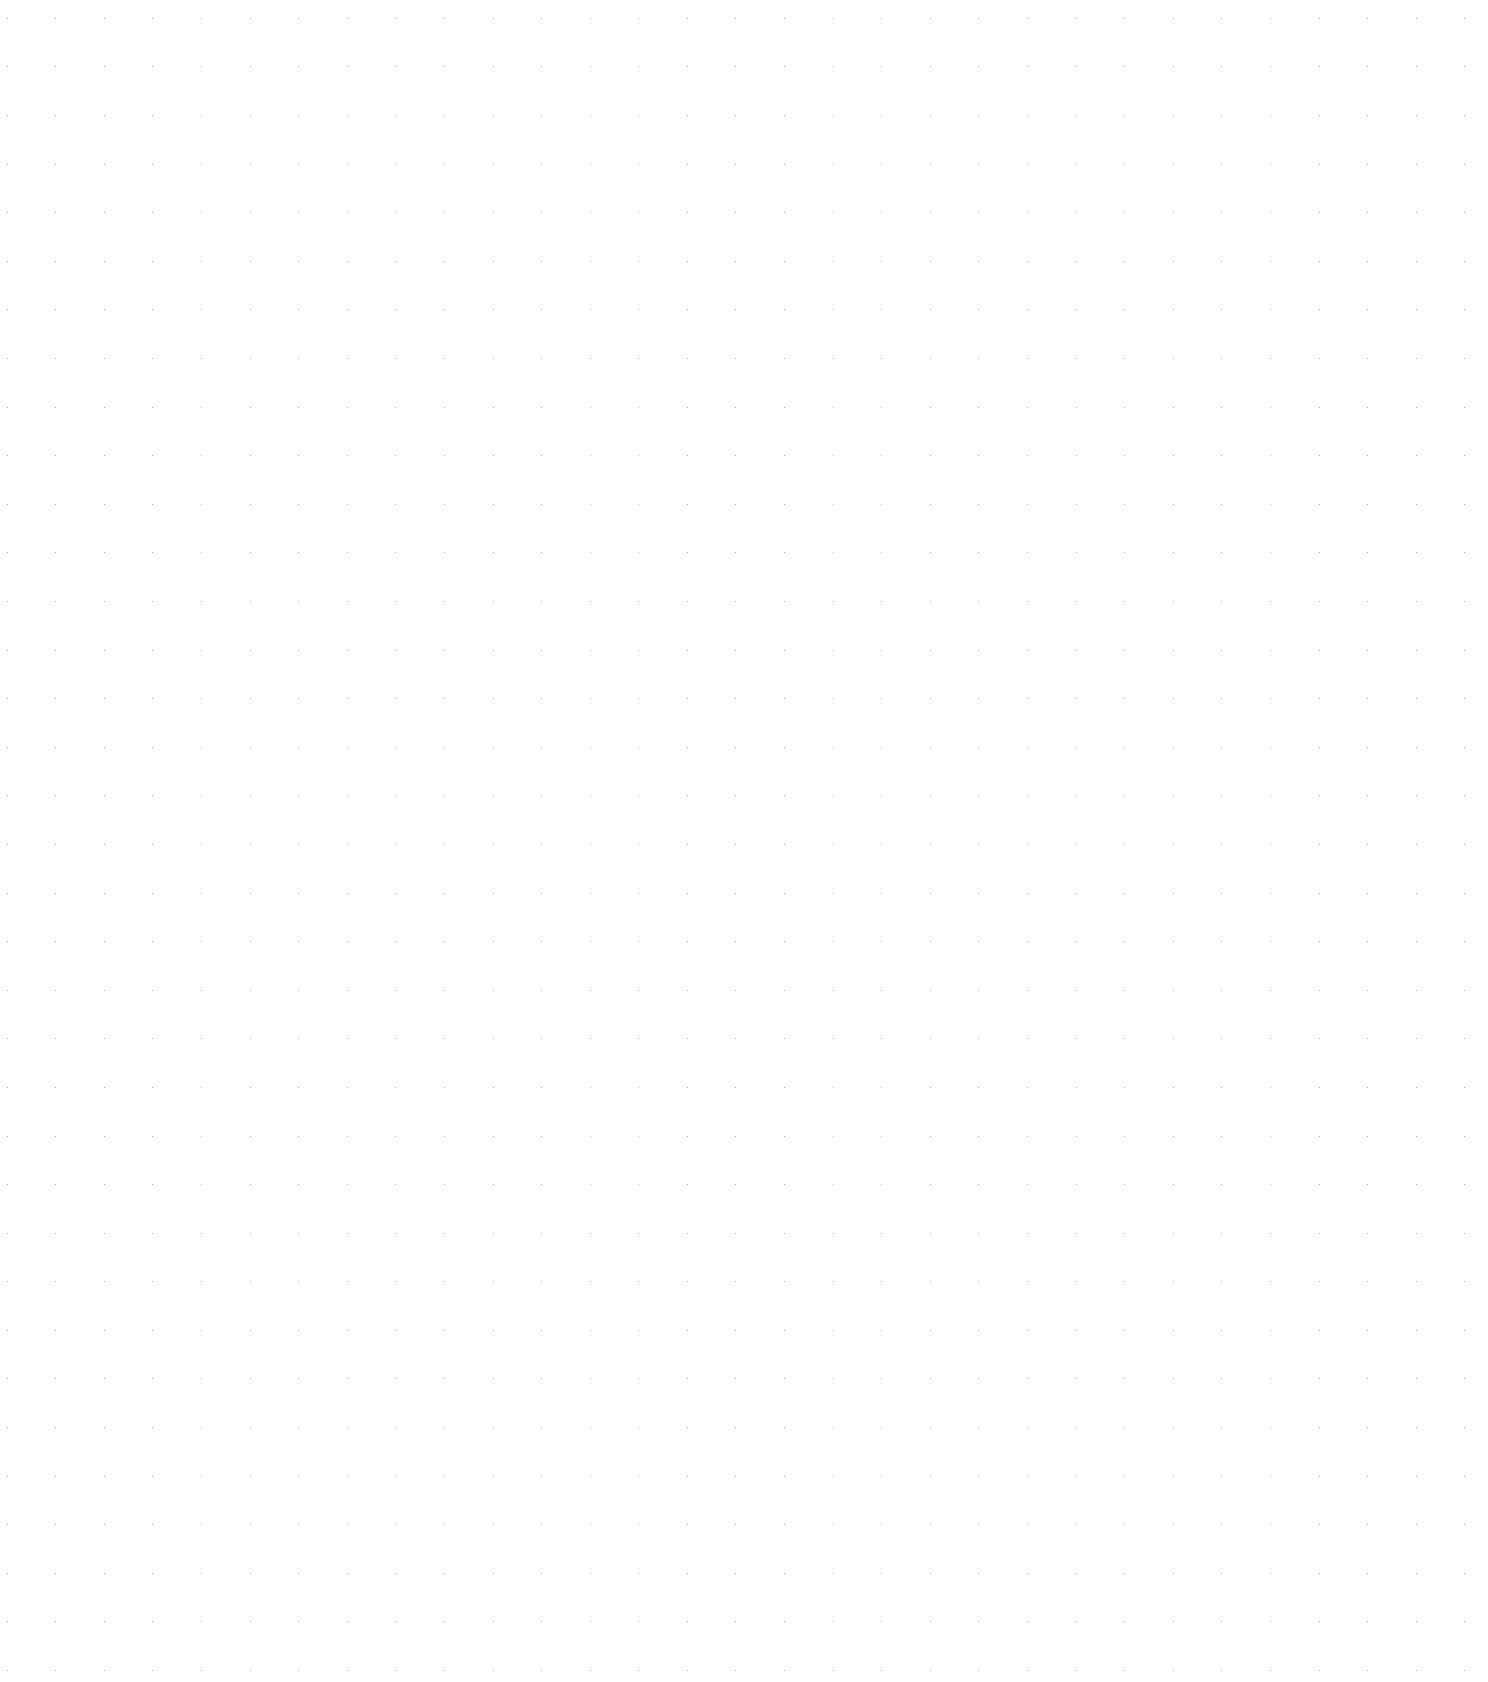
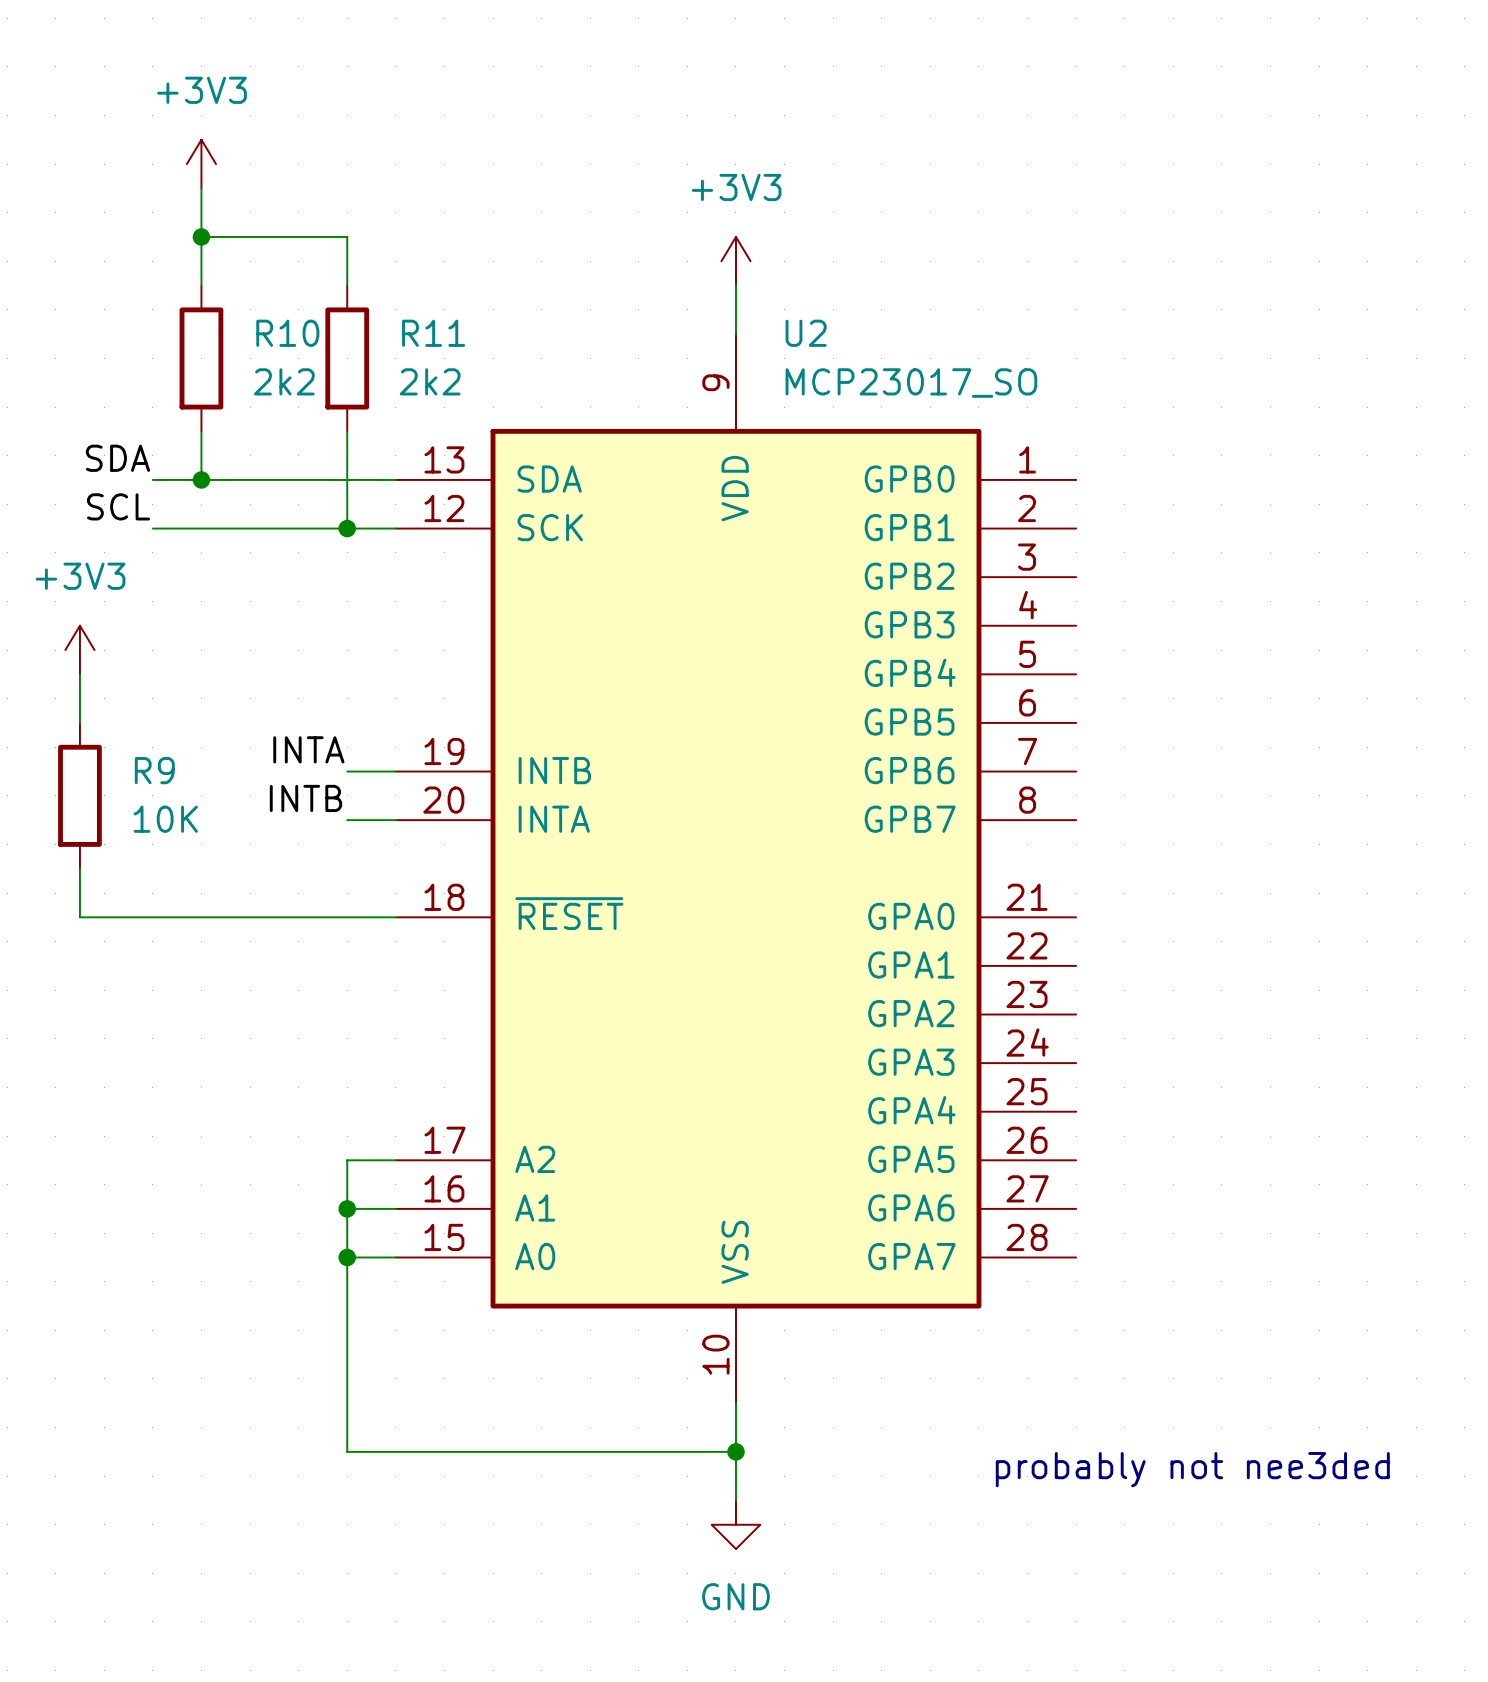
power symbol: none -> +3V3 (201, 164)
wire: none -> (201, 188) (201, 285)
wire: none -> (201, 236) (347, 236) (347, 285)
junction: none -> (201, 236)
power symbol: none -> +3V3 (735, 261)
wire: none -> (735, 285) (735, 334)
R10: none -> 2k2 (201, 358)
R11: none -> 2k2 (347, 358)
wire: none -> (201, 431) (201, 479)
wire: none -> (347, 431) (347, 528)
label: none -> SDA (117, 458)
wire: none -> (152, 479) (395, 479)
junction: none -> (201, 479)
label: none -> SCL (118, 506)
wire: none -> (152, 528) (395, 528)
junction: none -> (347, 528)
power symbol: none -> +3V3 (79, 650)
wire: none -> (79, 674) (79, 722)
label: none -> INTA (308, 749)
wire: none -> (347, 771) (395, 771)
R9: none -> 10K (79, 795)
label: none -> INTB (305, 798)
wire: none -> (347, 820) (395, 820)
wire: none -> (79, 868) (79, 917) (395, 917)
U2: none -> MCP23017_SO (735, 868)
wire: none -> (395, 1160) (347, 1160) (347, 1451) (735, 1451)
wire: none -> (347, 1208) (395, 1208)
junction: none -> (347, 1208)
wire: none -> (347, 1257) (395, 1257)
junction: none -> (347, 1257)
wire: none -> (735, 1403) (735, 1500)
junction: none -> (735, 1451)
text: none -> probably not nee3ded (1192, 1469)
power symbol: none -> GND (735, 1524)

